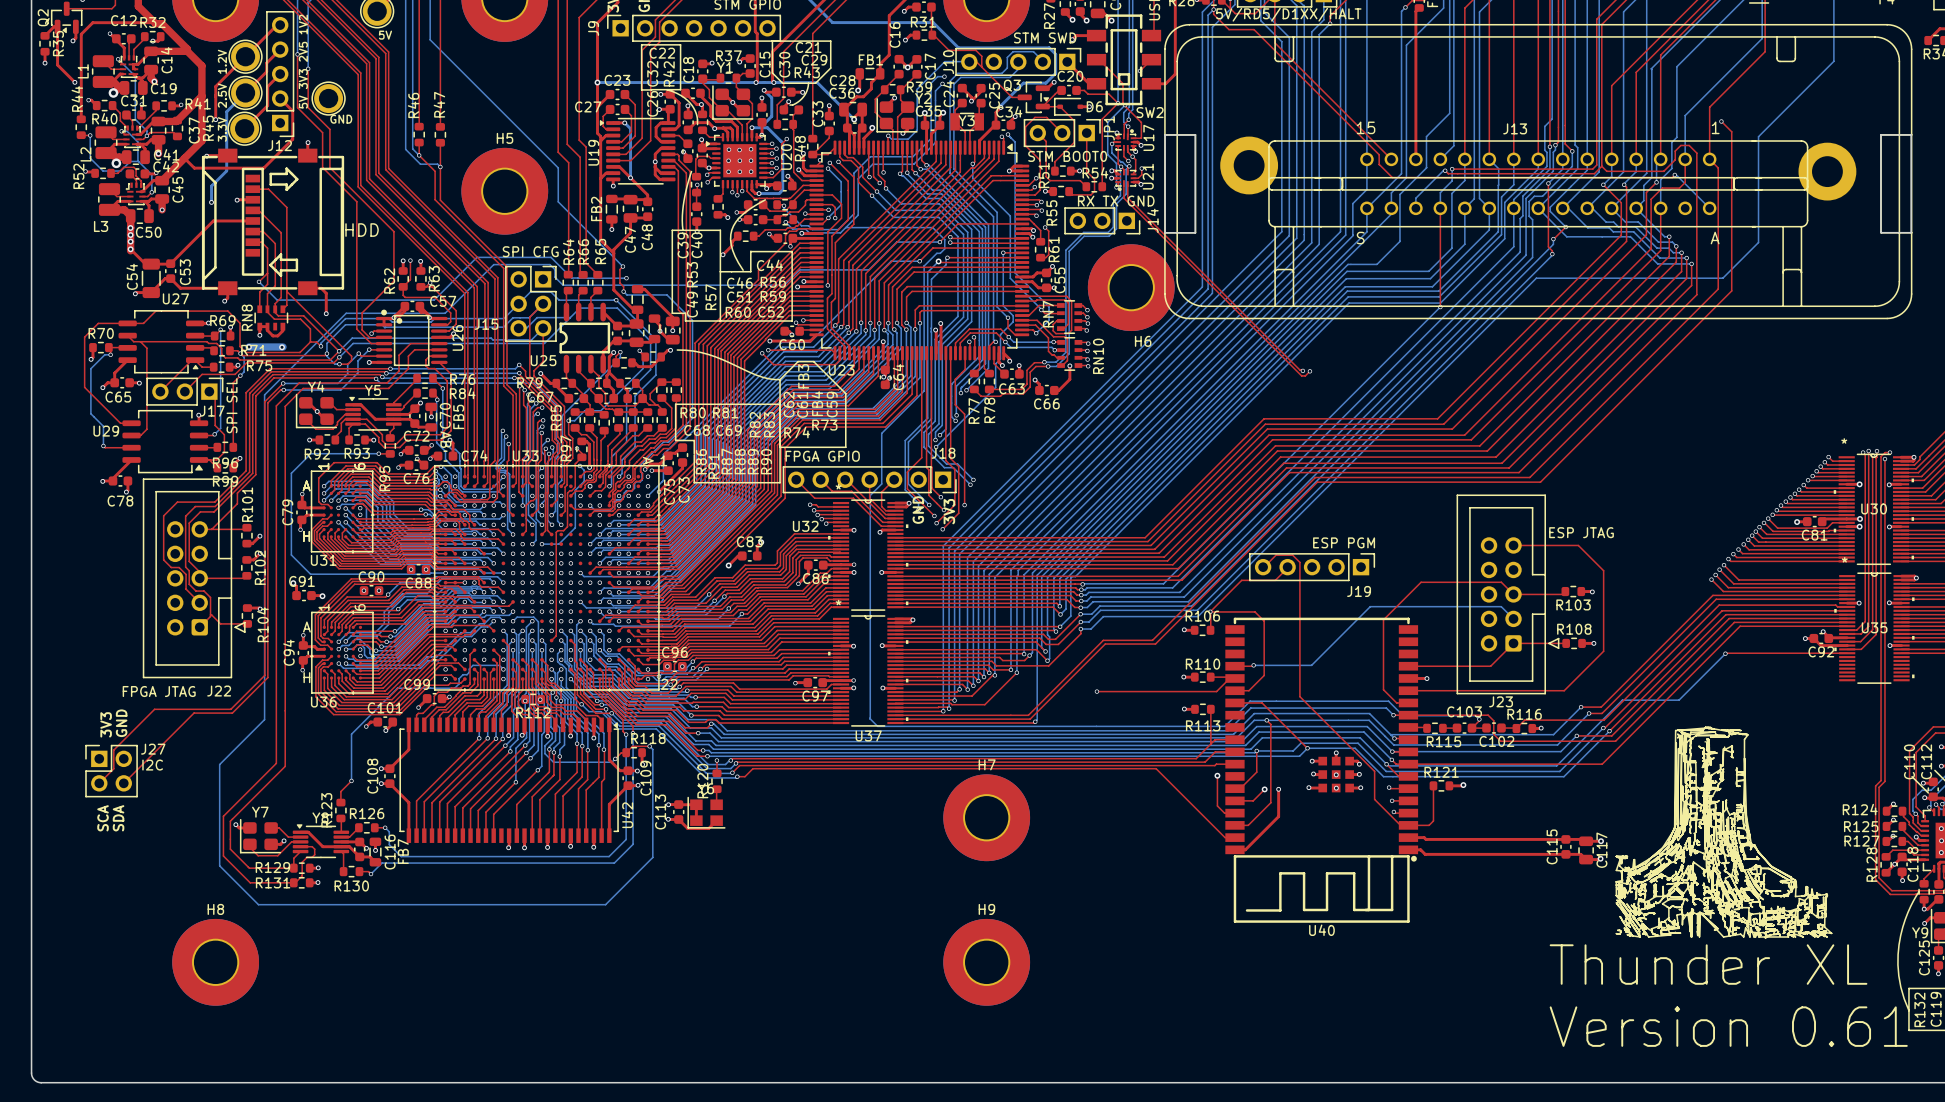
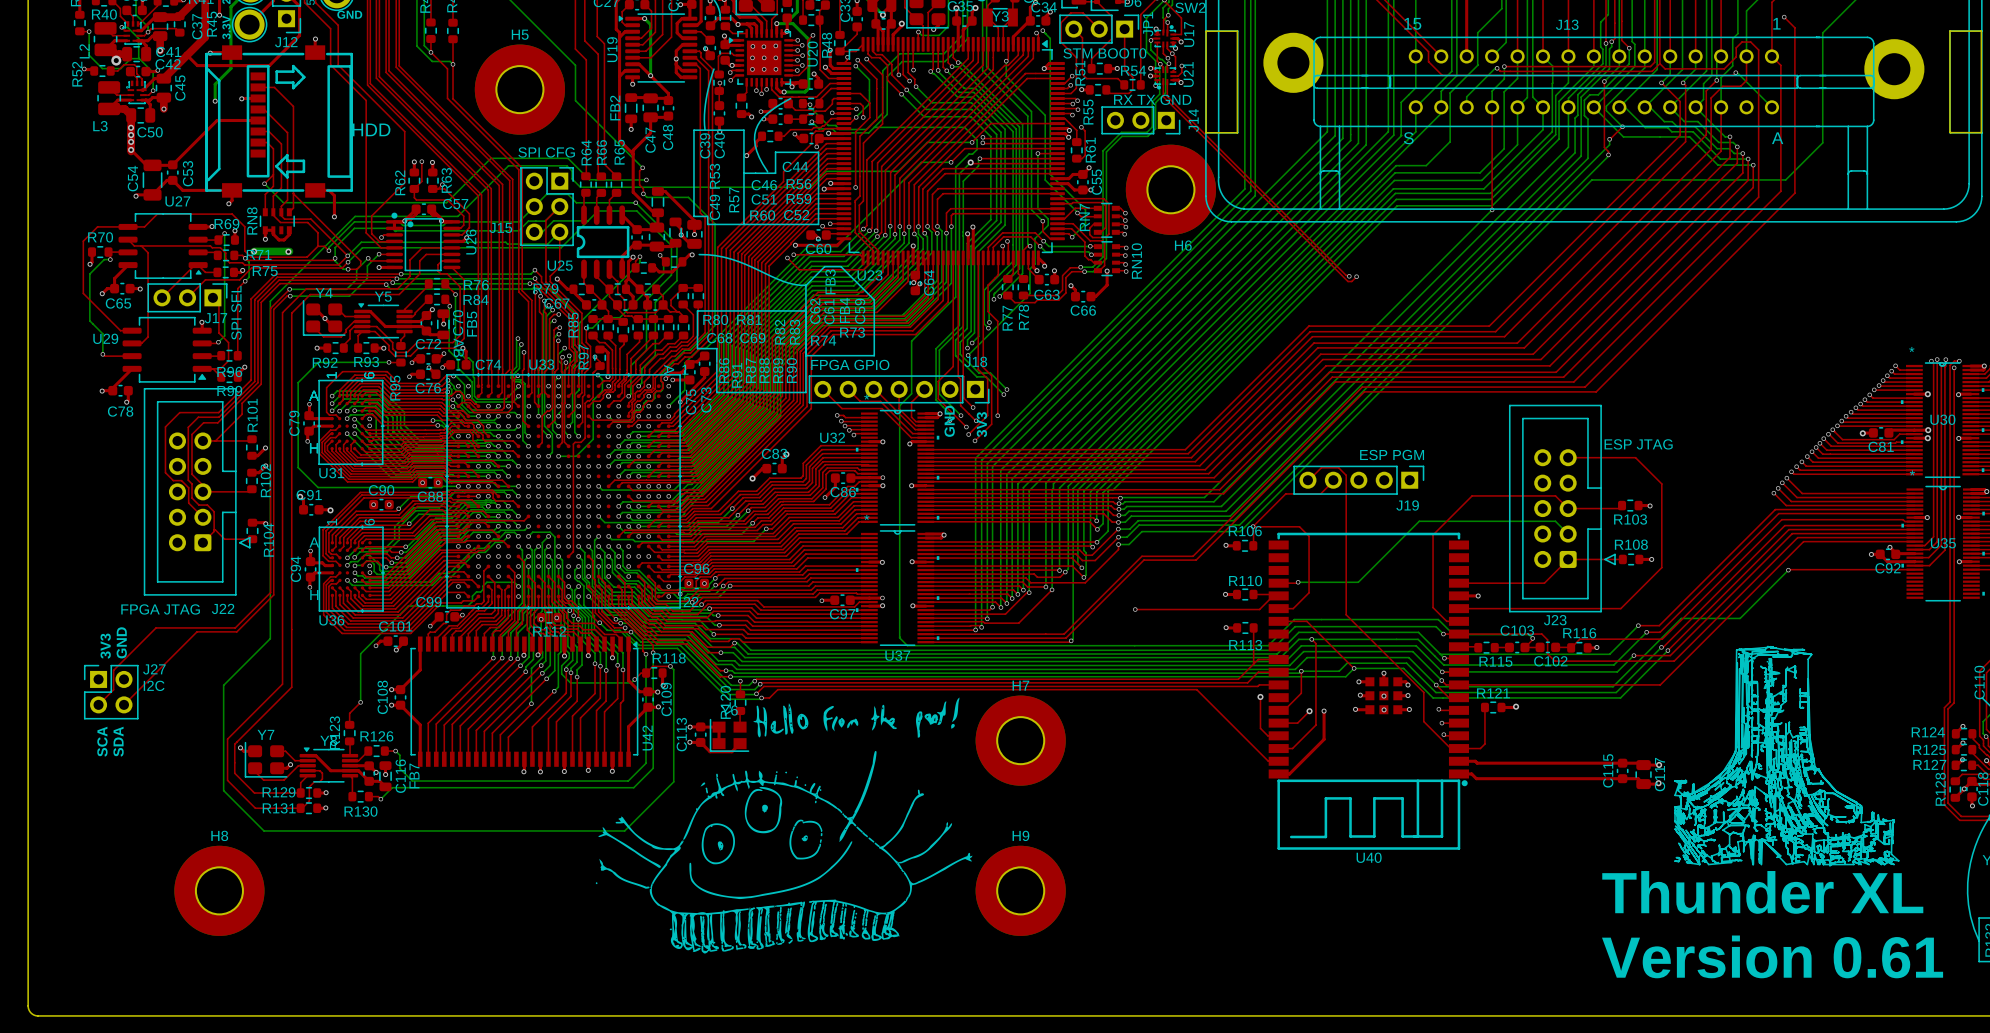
drawing: none -> [915, 697, 960, 738]
drawing: none -> [753, 703, 809, 738]
drawing: none -> [870, 704, 897, 731]
drawing: none -> [823, 705, 859, 732]
drawing: none -> [595, 751, 973, 954]

